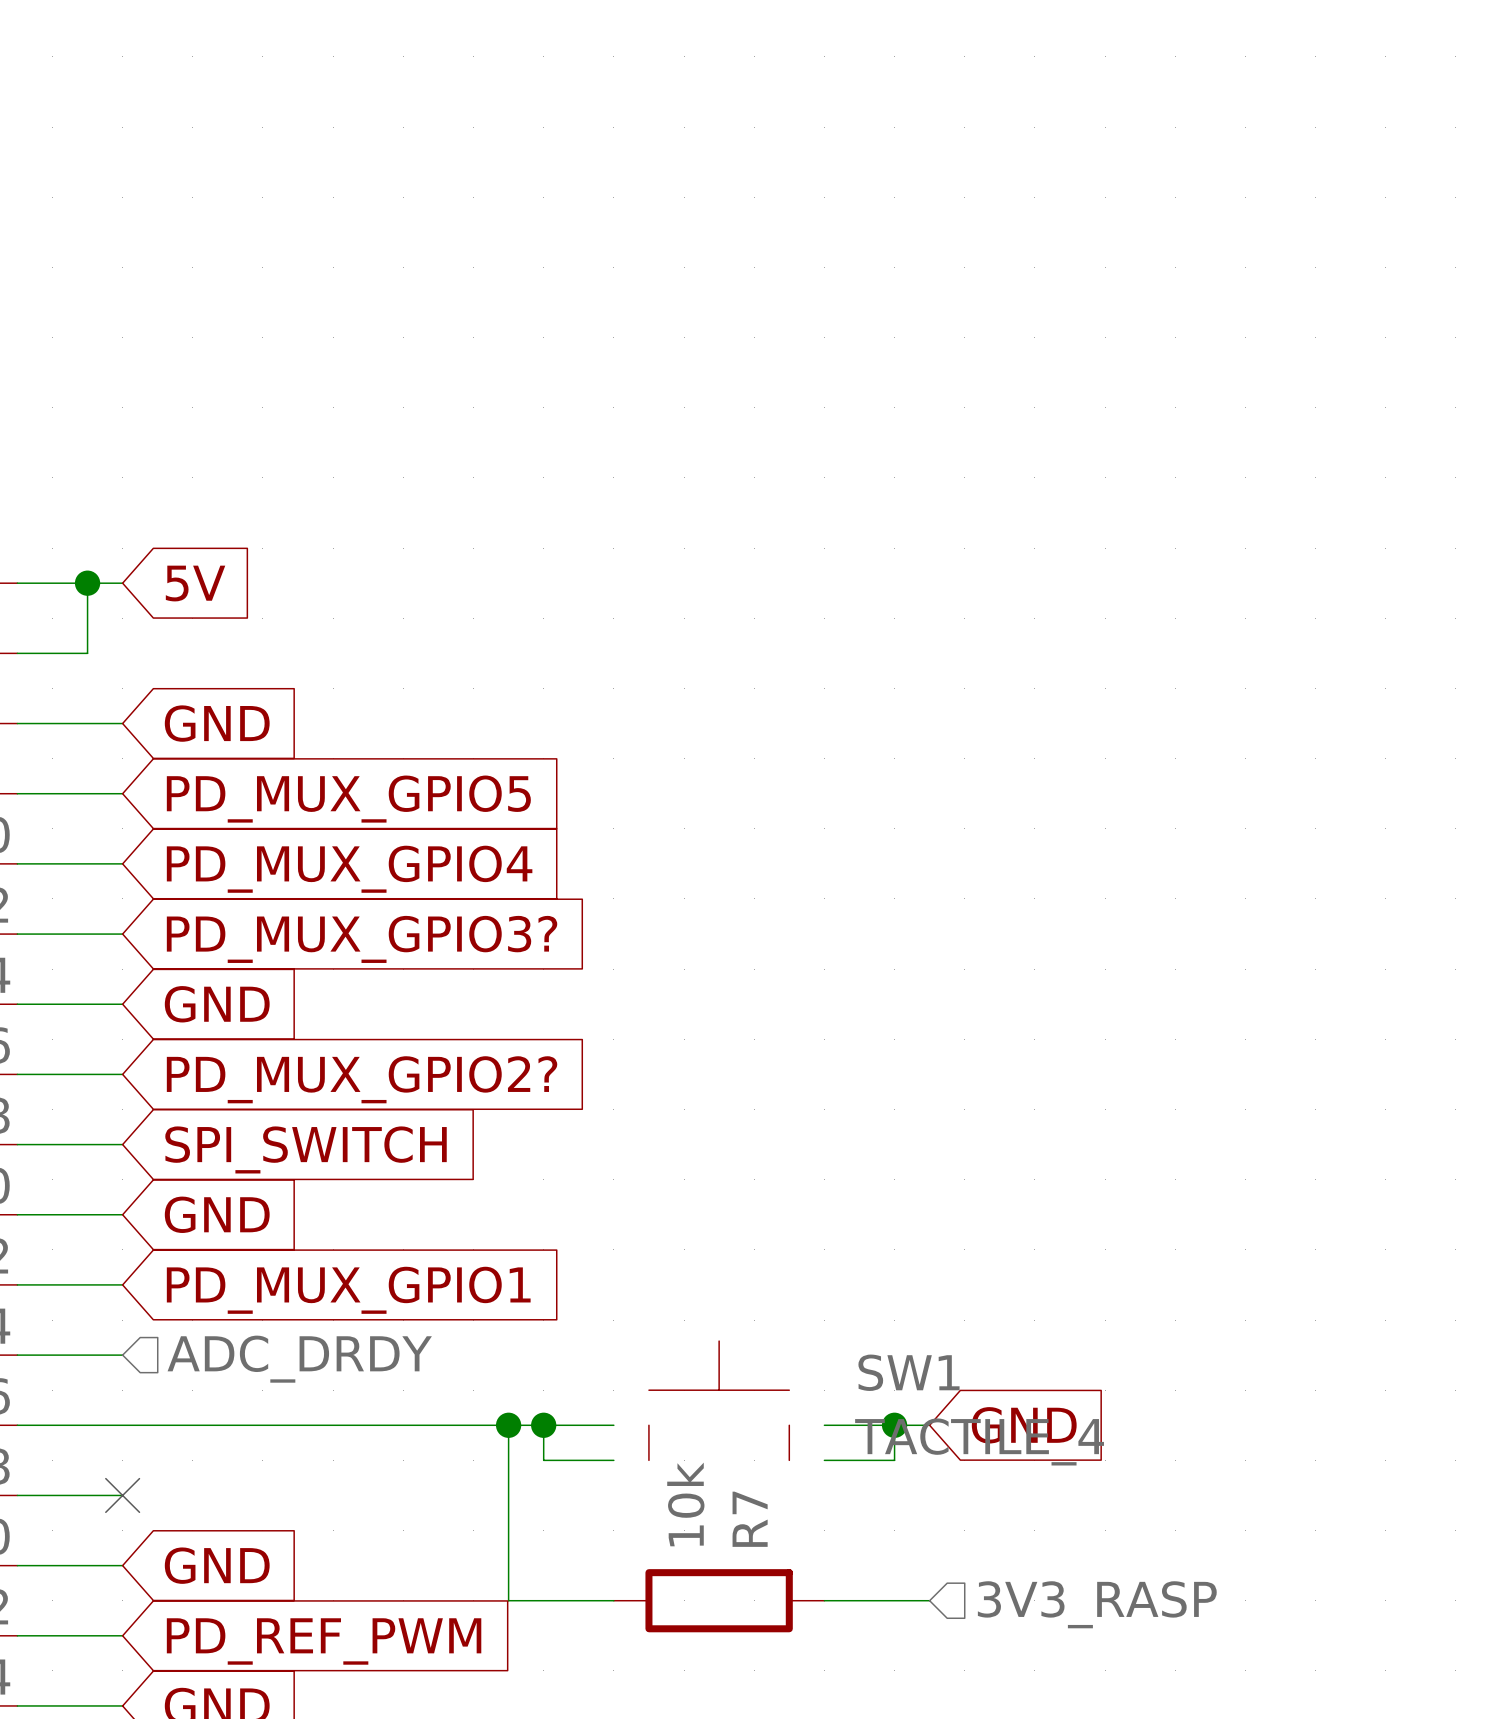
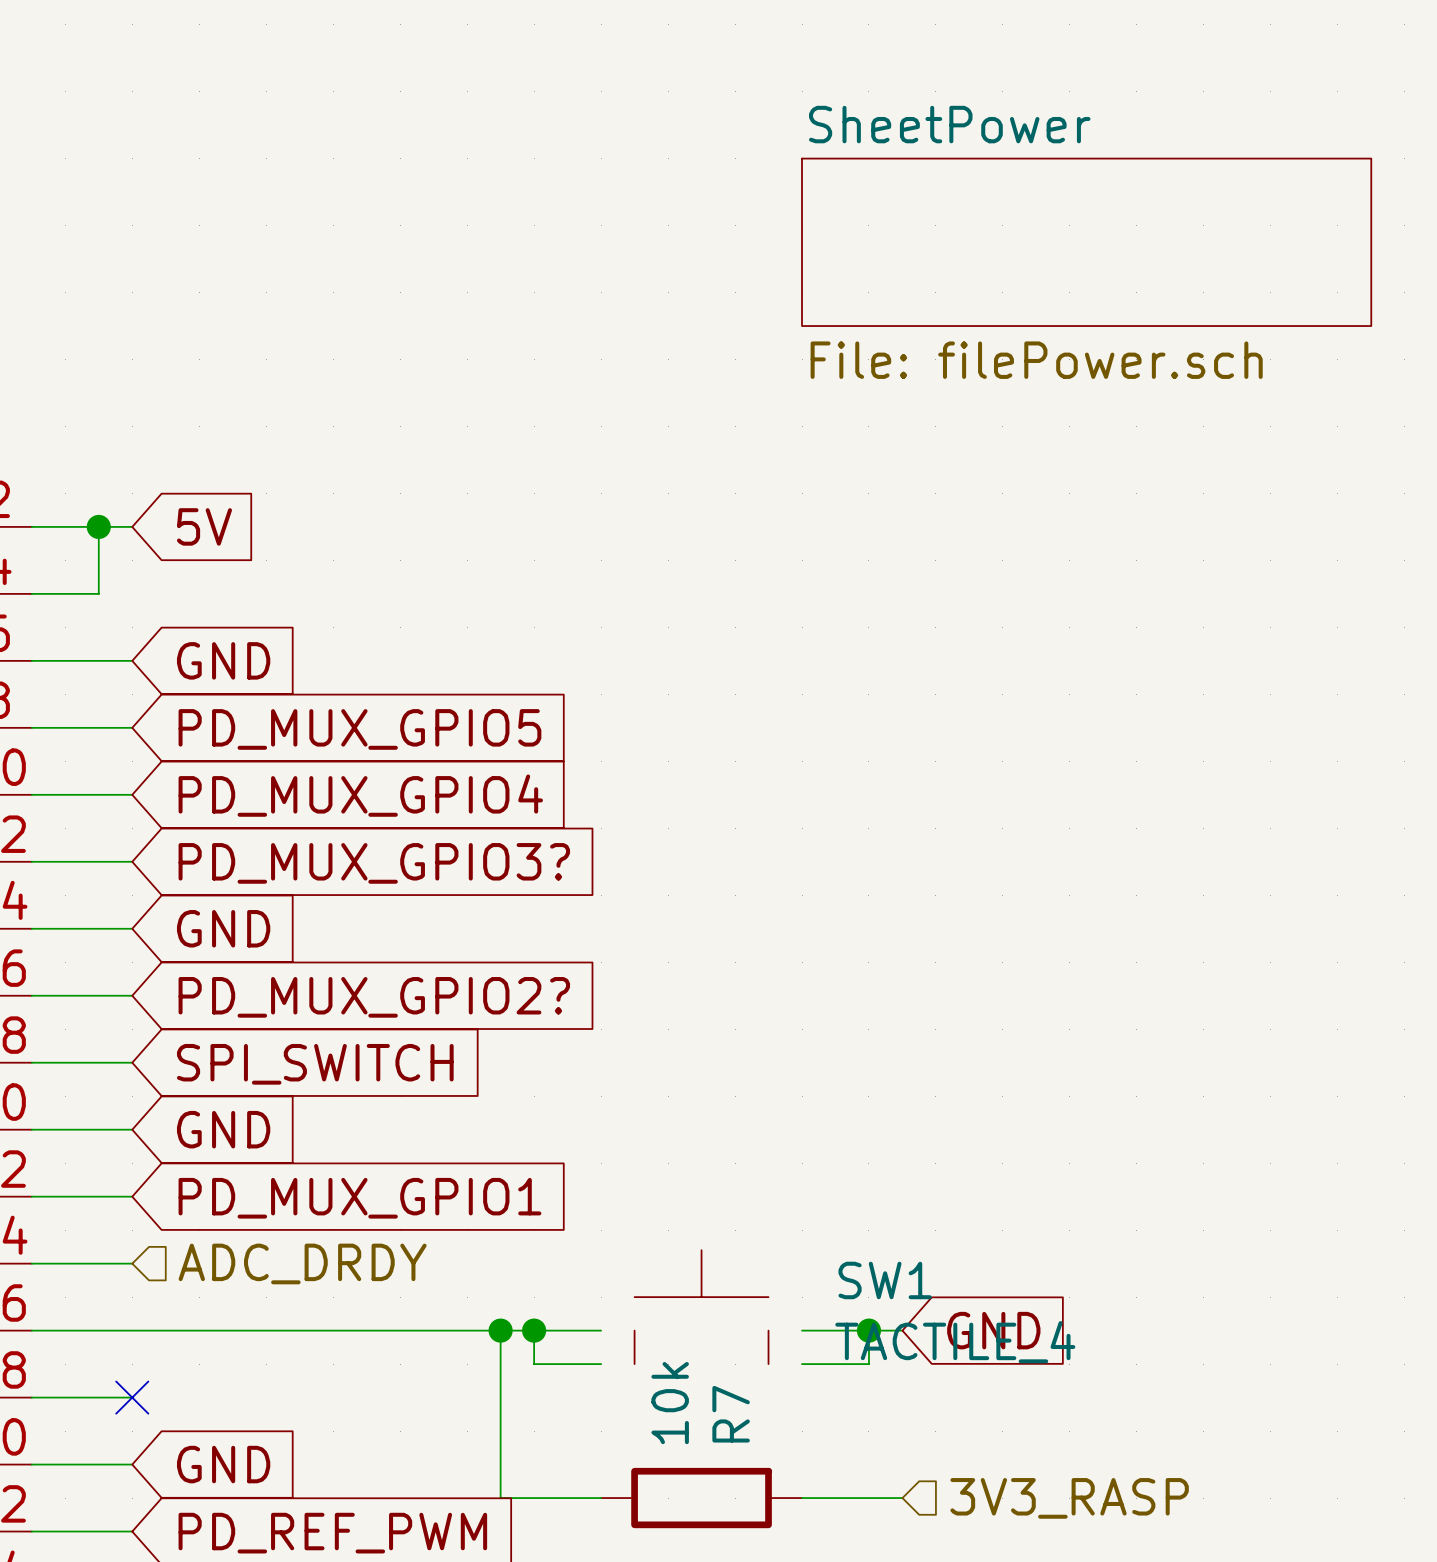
sheet SheetPower: none -> File: filePower.sch (1086, 242)

